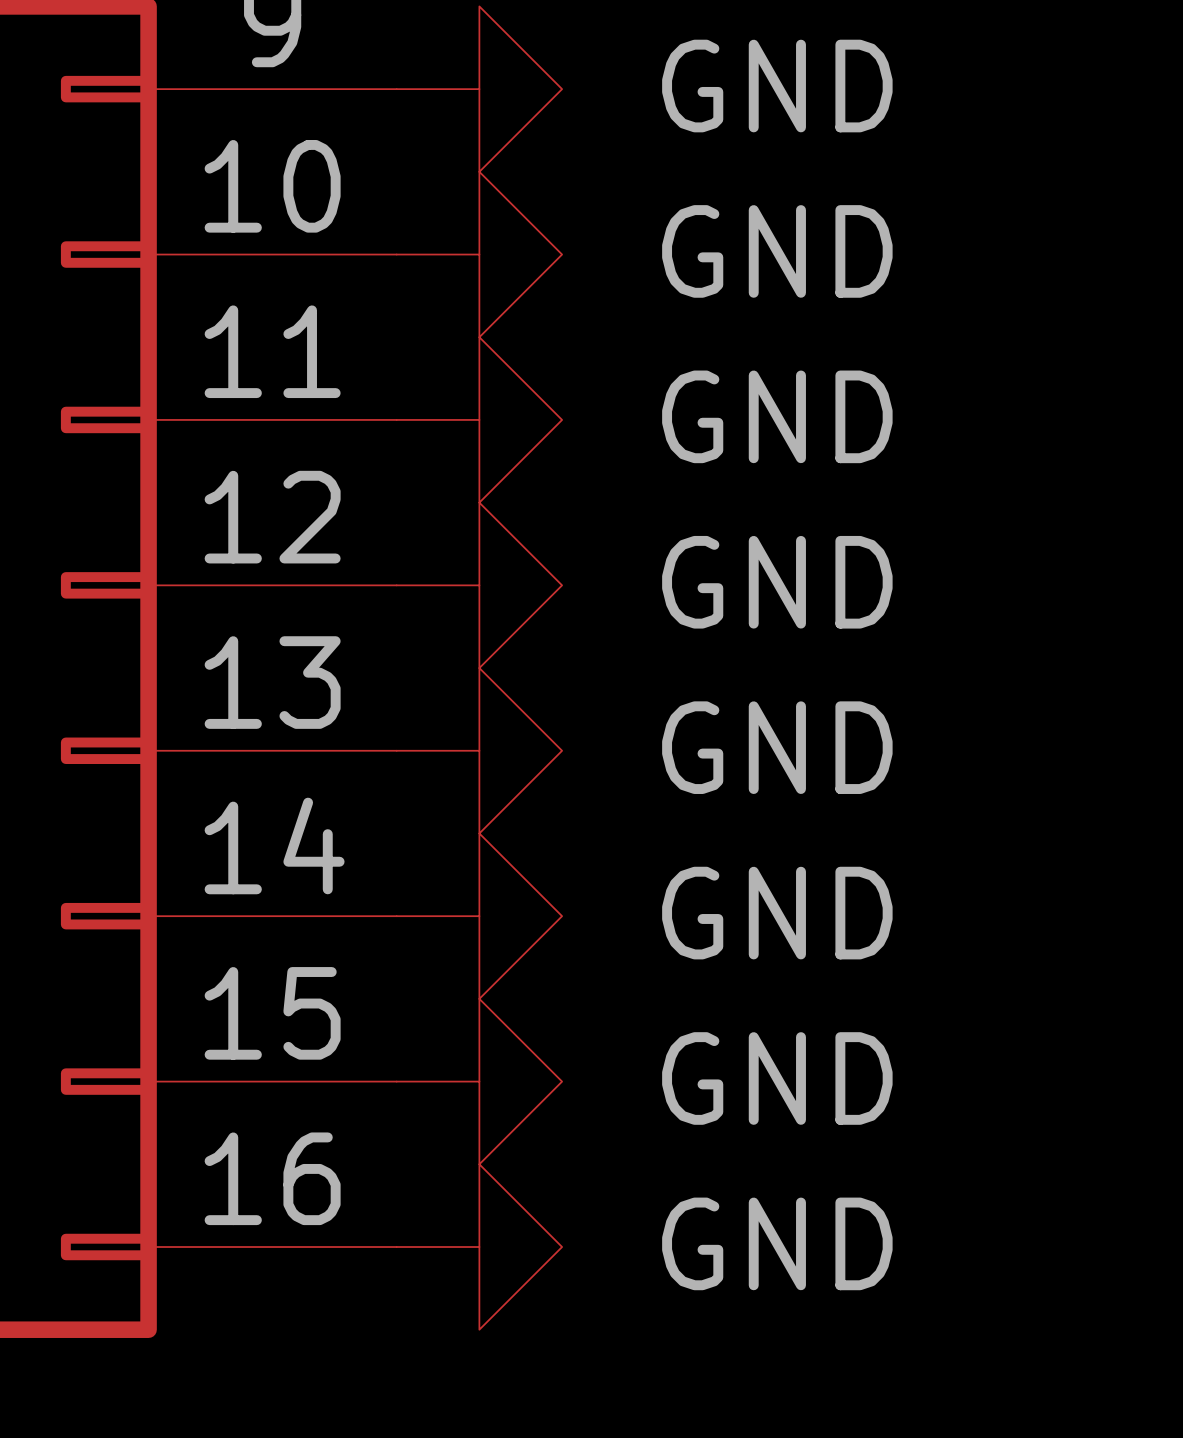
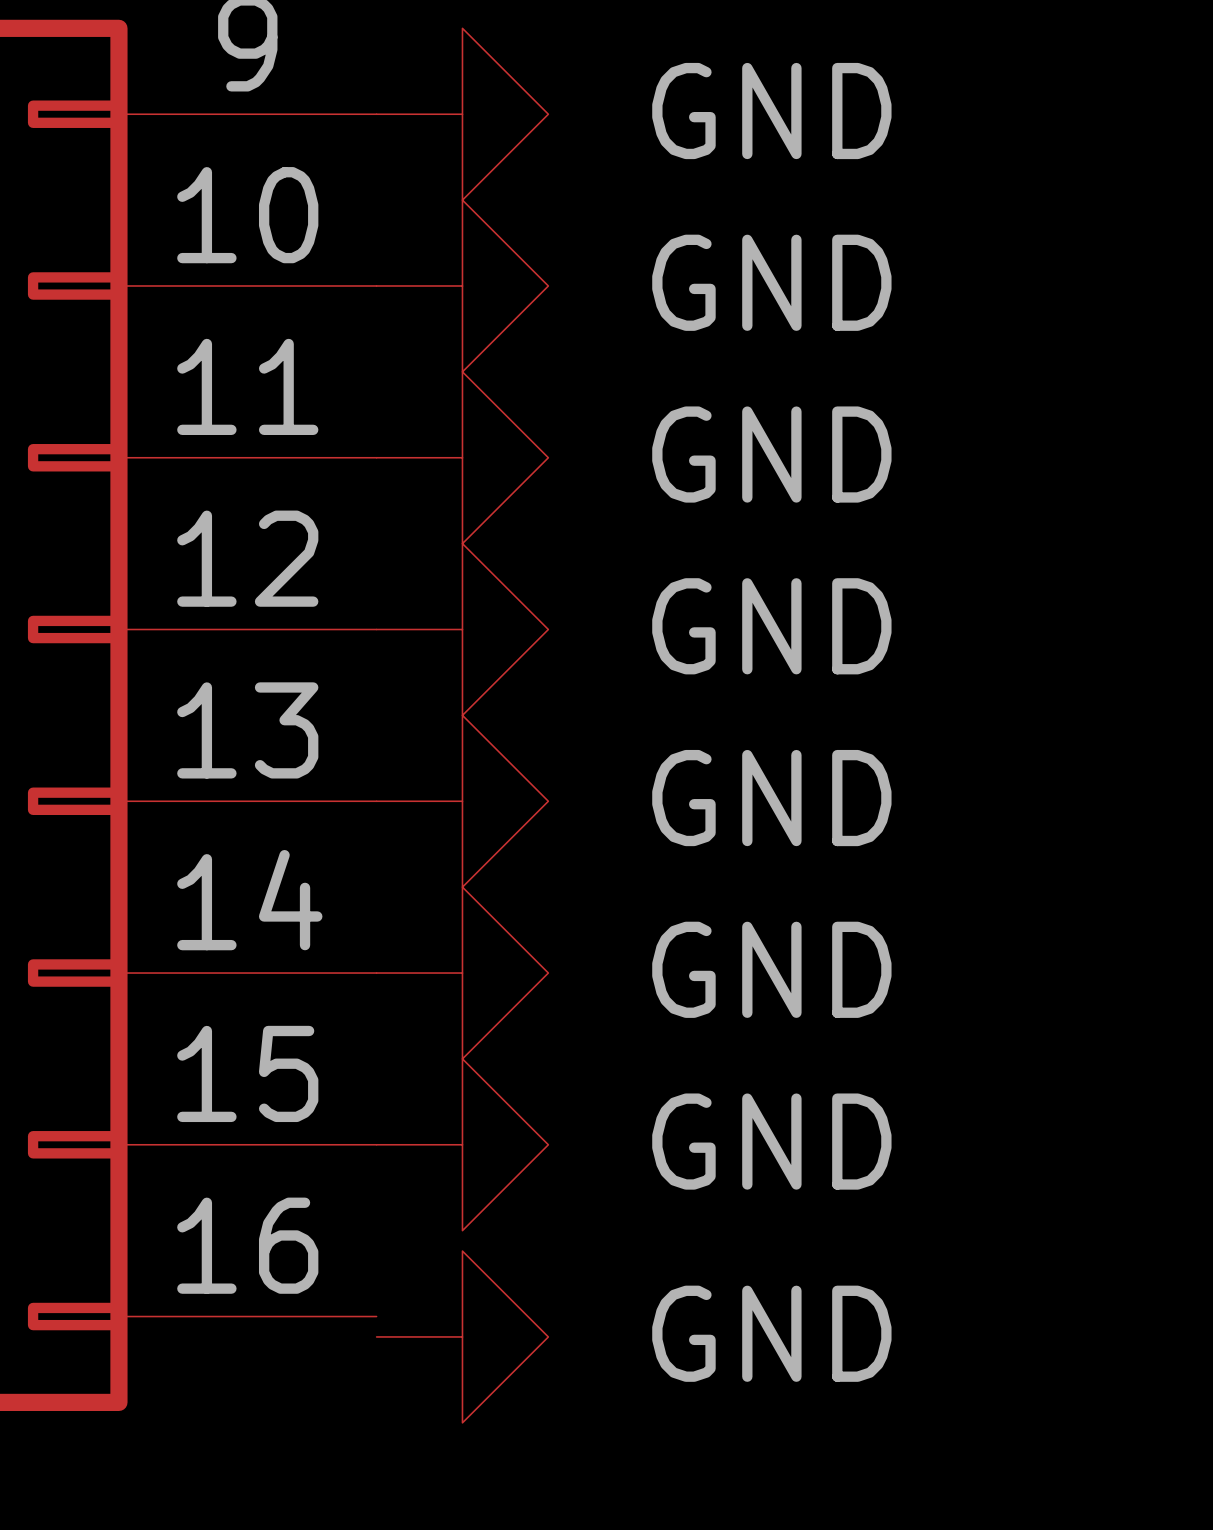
power symbol position: GND (479, 1247) -> GND (462, 1336)

